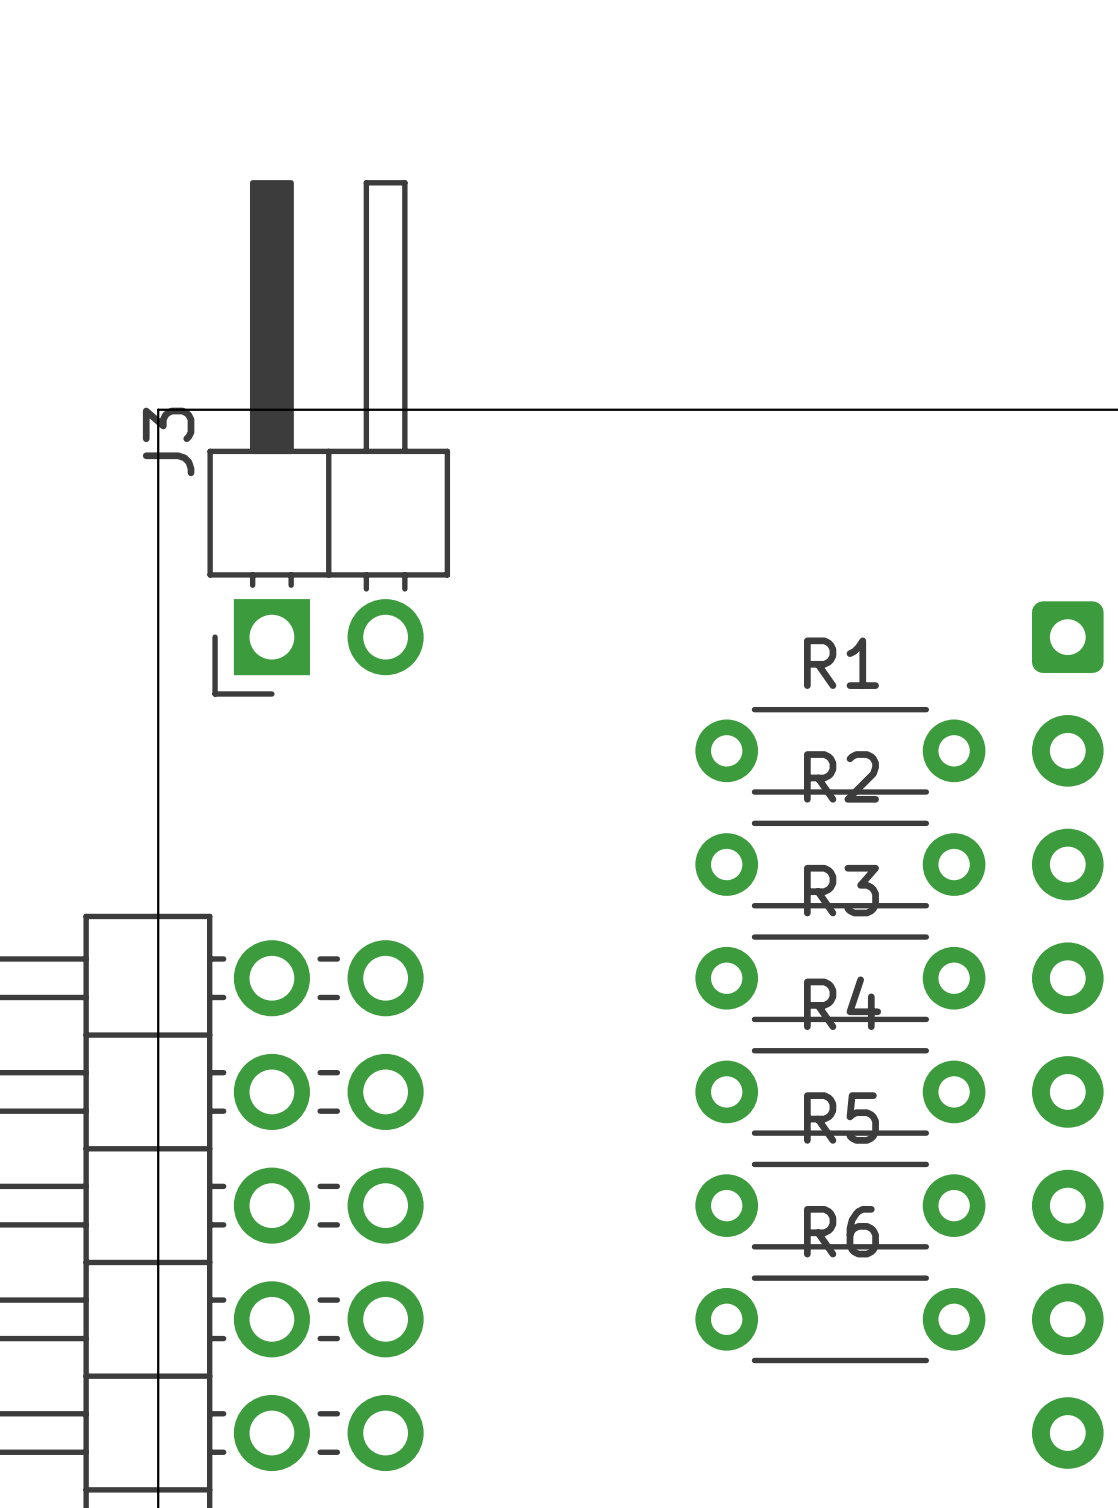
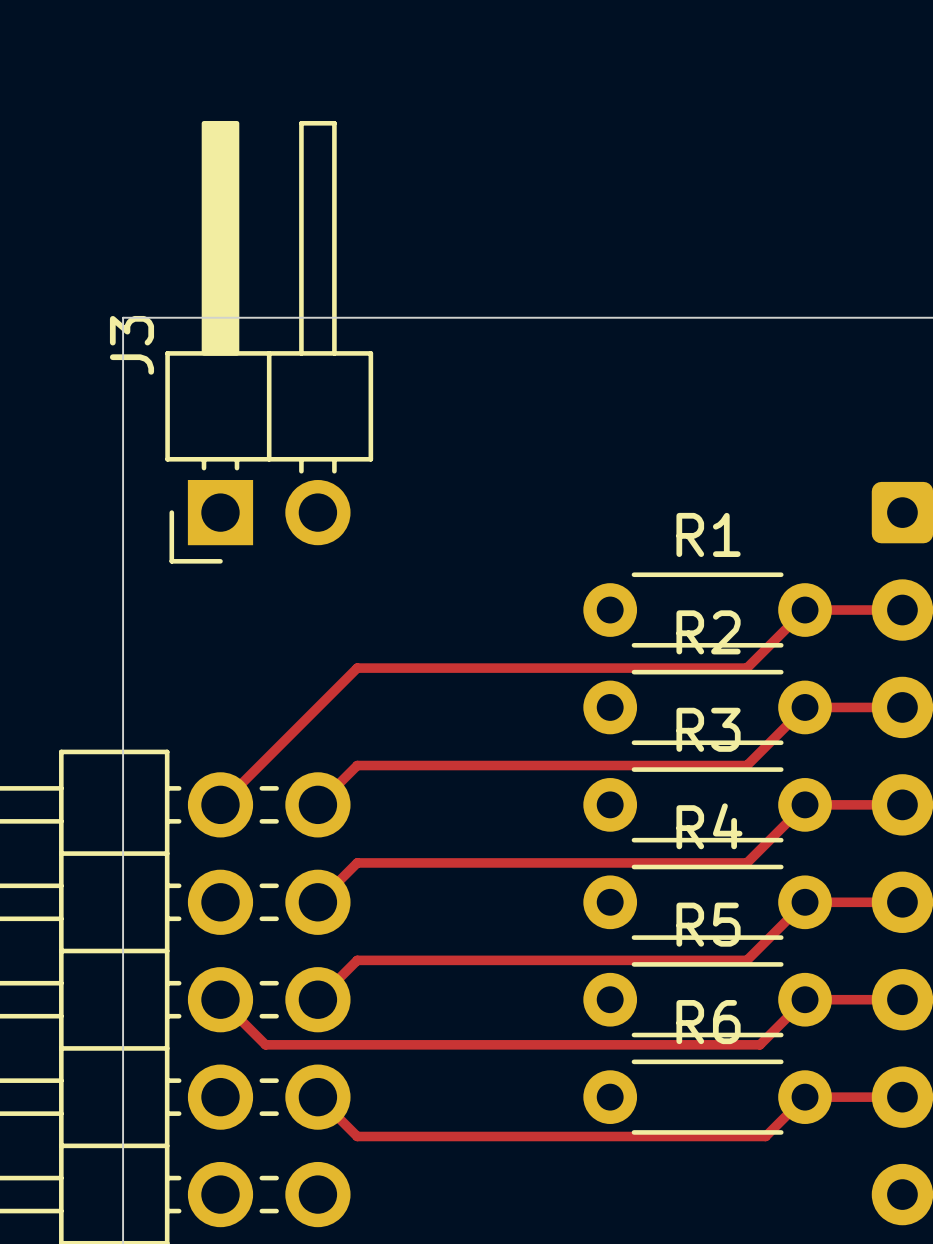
top track: none -> (902, 610) (805, 610) (746, 668) (357, 668) (220, 804)
top track: none -> (902, 707) (805, 707) (746, 765) (357, 765) (317, 804)
top track: none -> (902, 804) (805, 804) (746, 862) (357, 862) (317, 902)
top track: none -> (902, 902) (805, 902) (746, 960) (357, 960) (317, 999)
top track: none -> (220, 999) (265, 1044) (759, 1044) (805, 999) (902, 999)
top track: none -> (317, 1097) (357, 1136) (765, 1136) (805, 1097) (902, 1097)

